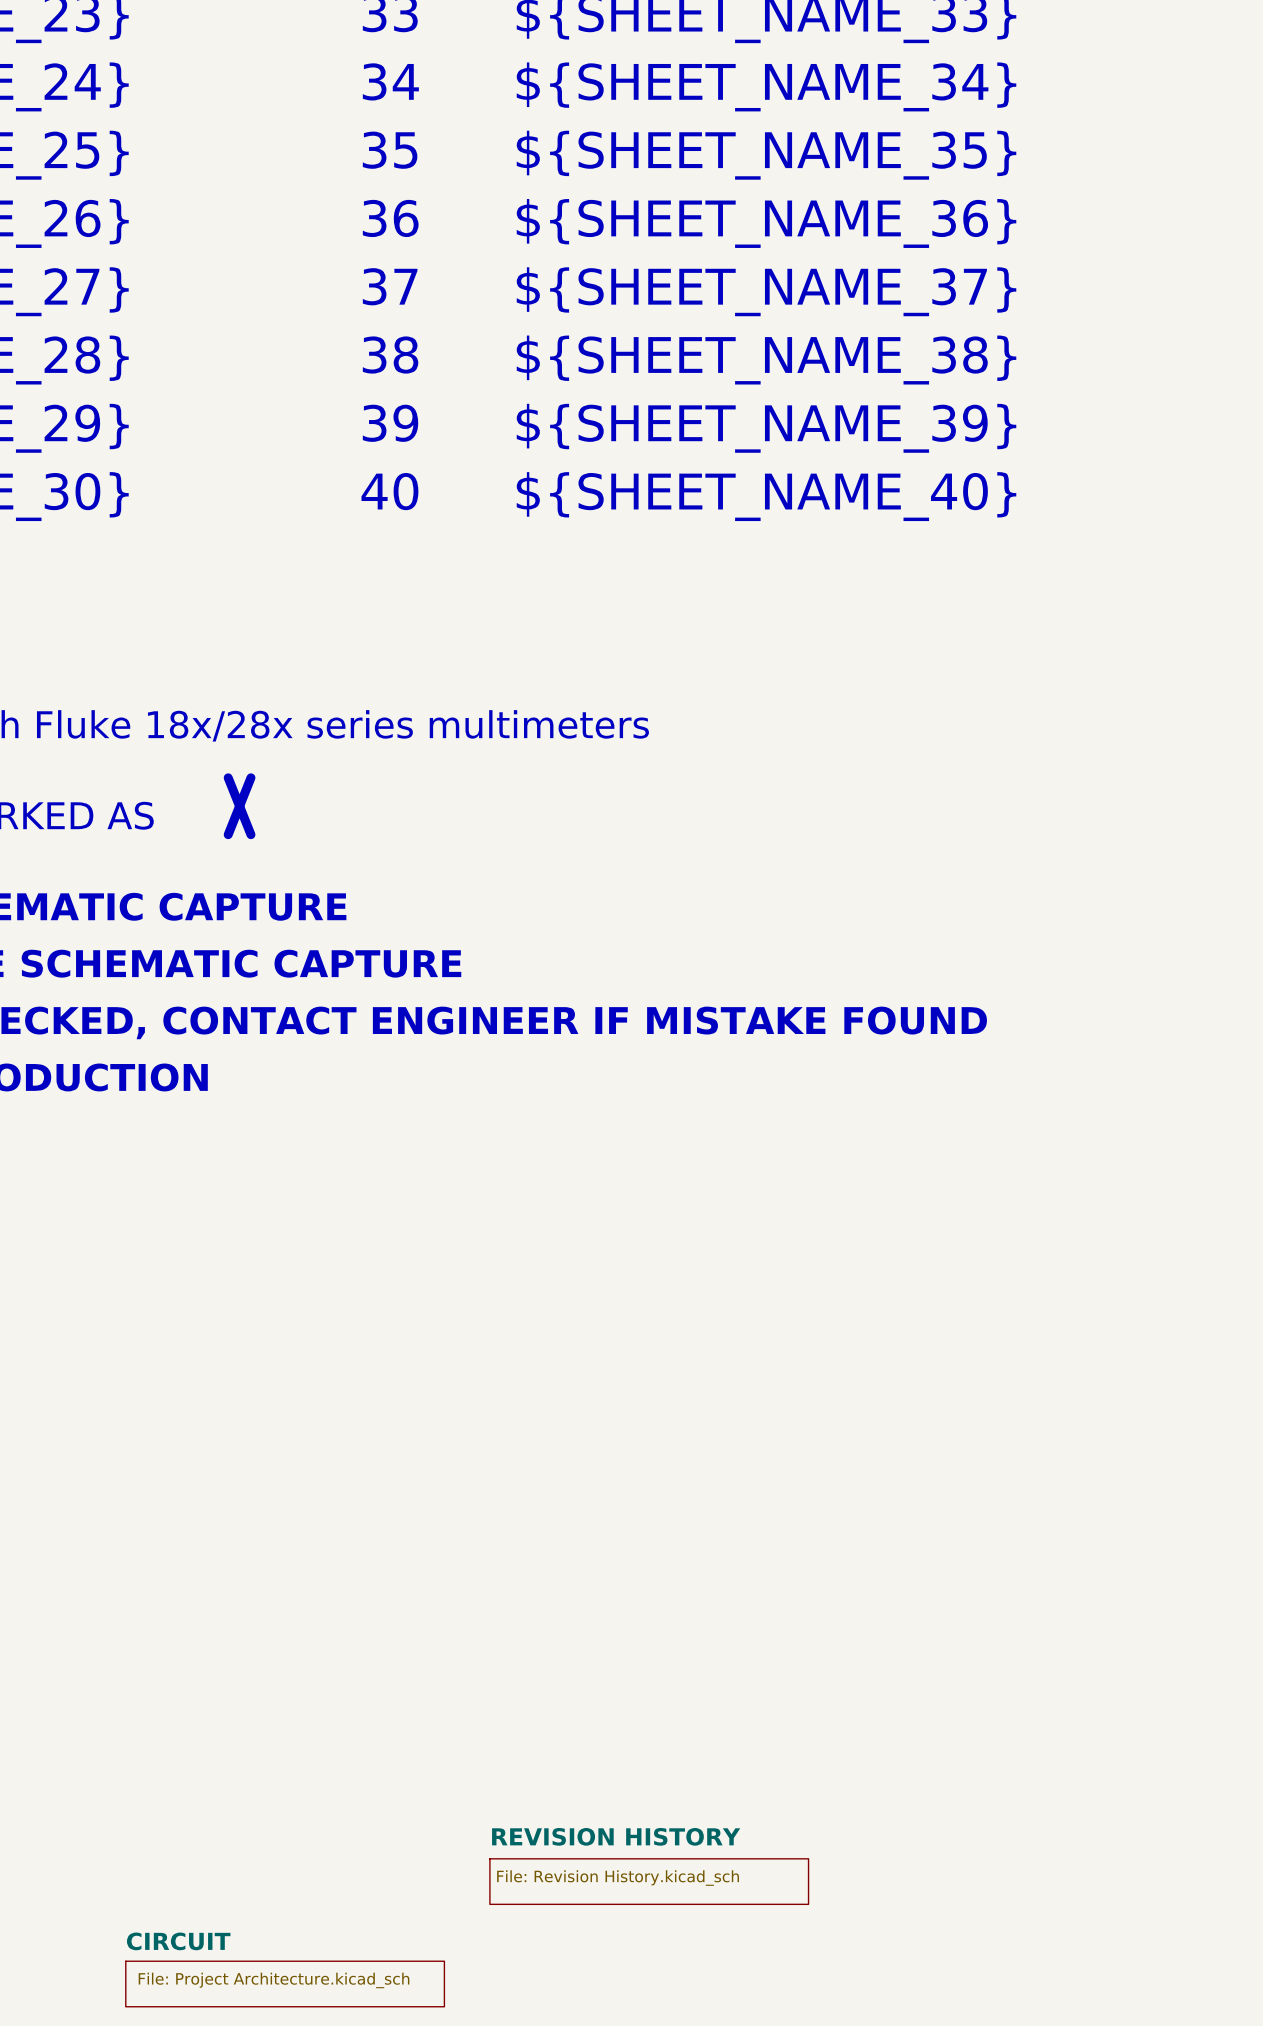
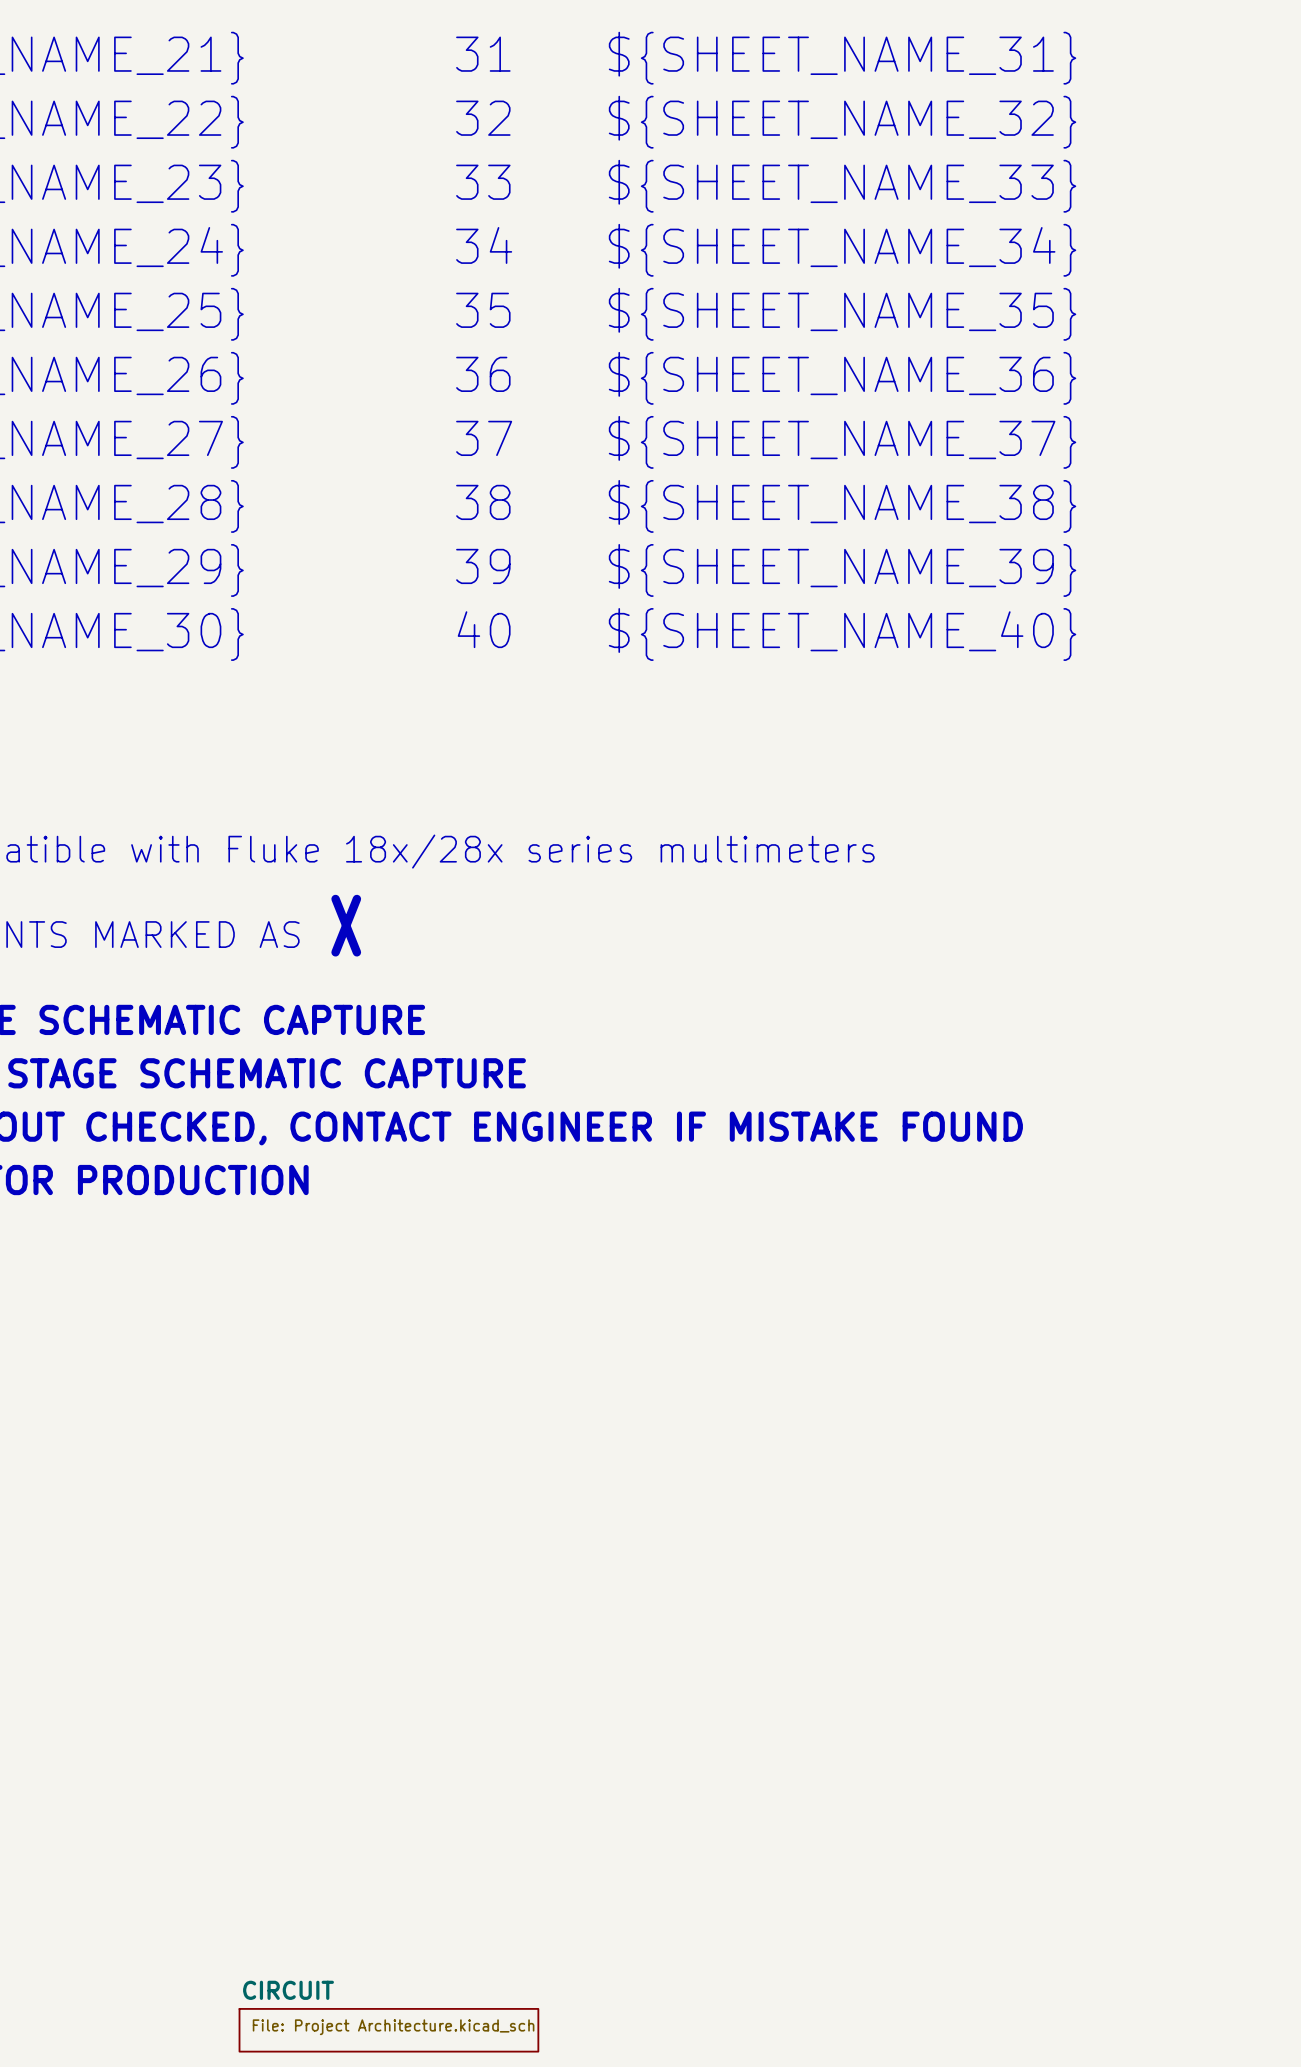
sheet REVISION HISTORY: File: Revision History.kicad_sch (649, 1881) -> none

